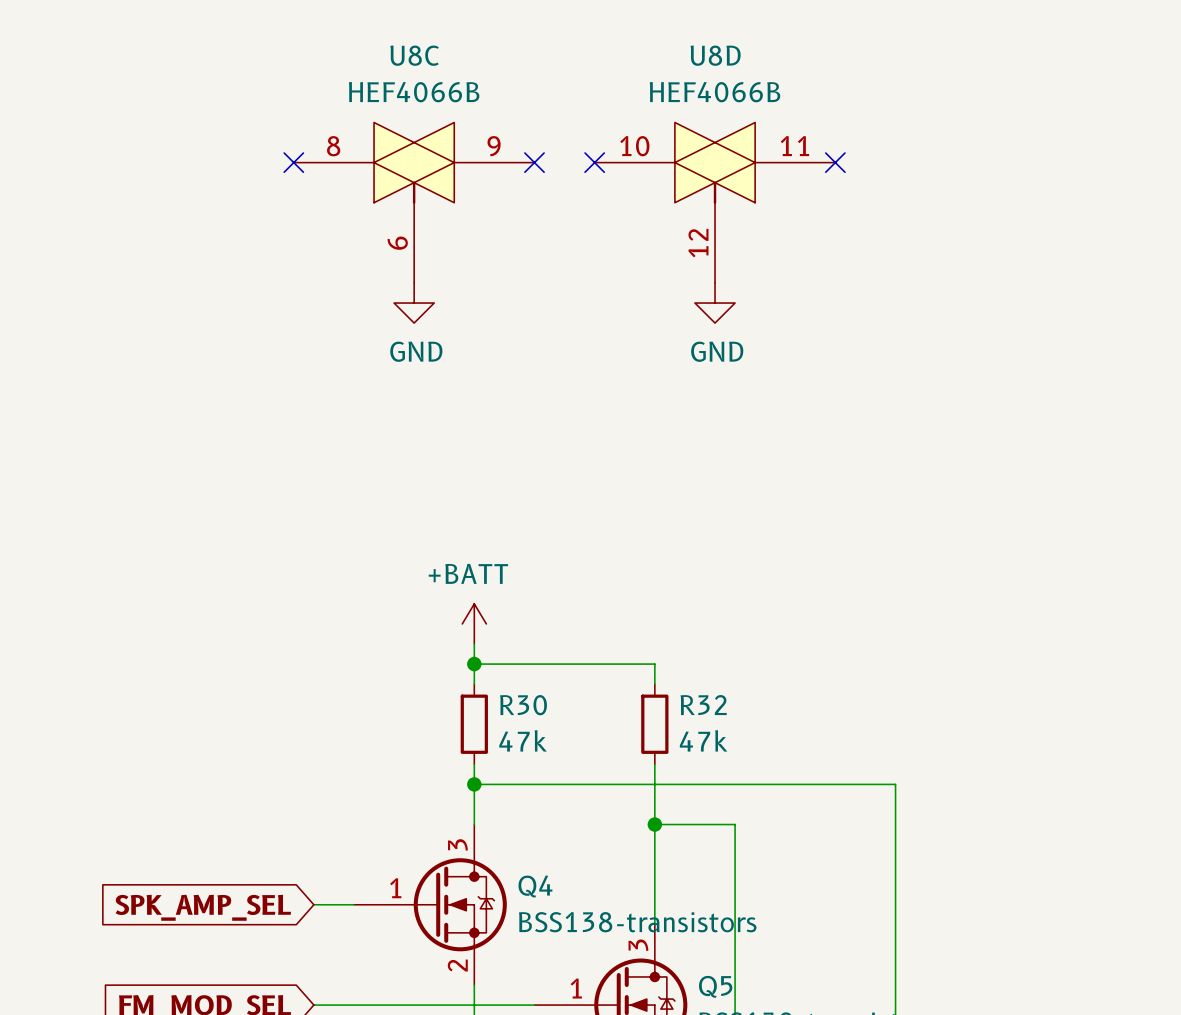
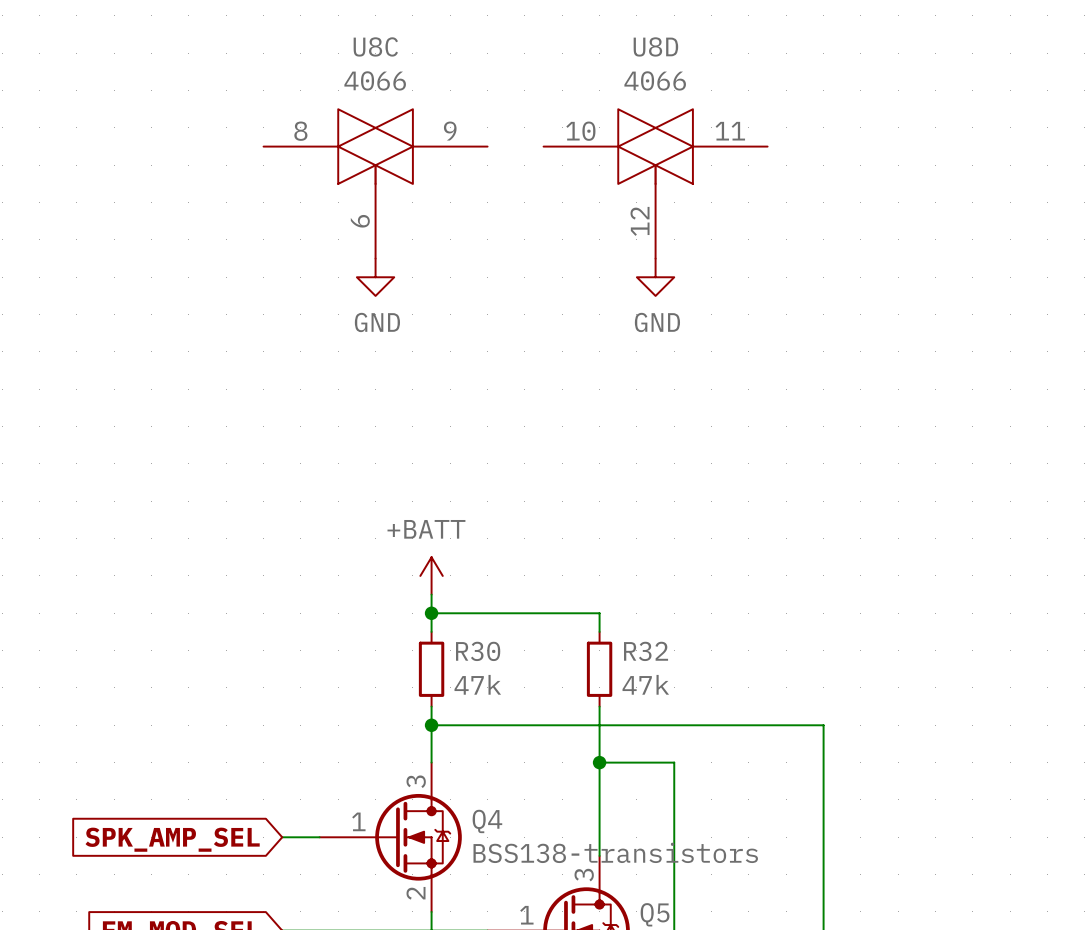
U8C value: HEF4066B (414, 92) -> 4066 (375, 80)
U8D value: HEF4066B (714, 92) -> 4066 (655, 80)
no-connect mark: (293, 162) -> none
no-connect mark: (534, 162) -> none
no-connect mark: (594, 162) -> none
no-connect mark: (835, 162) -> none

